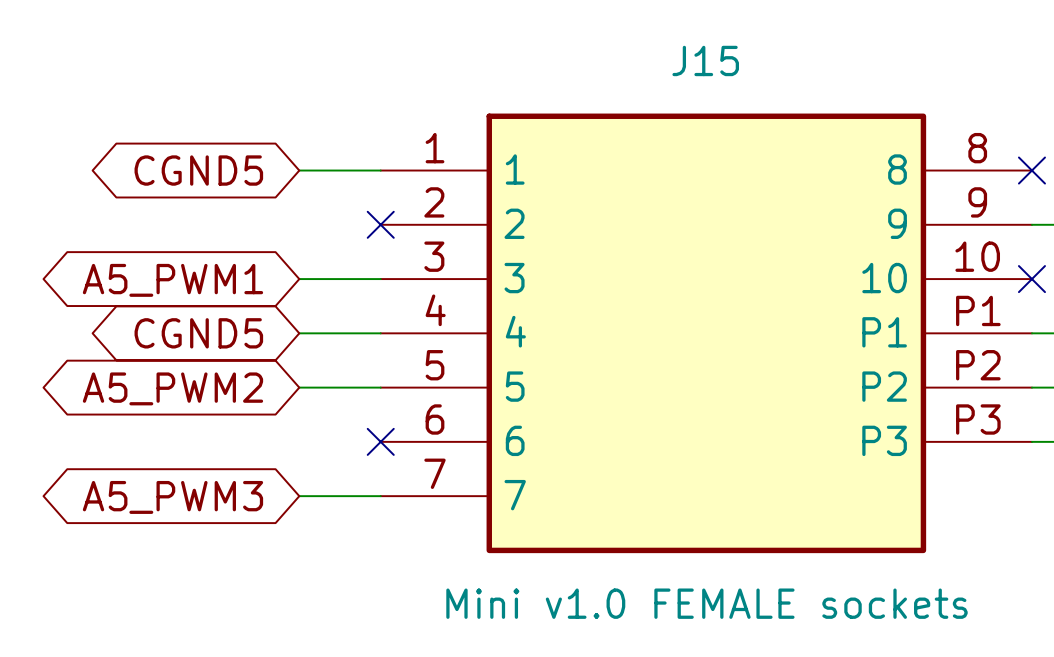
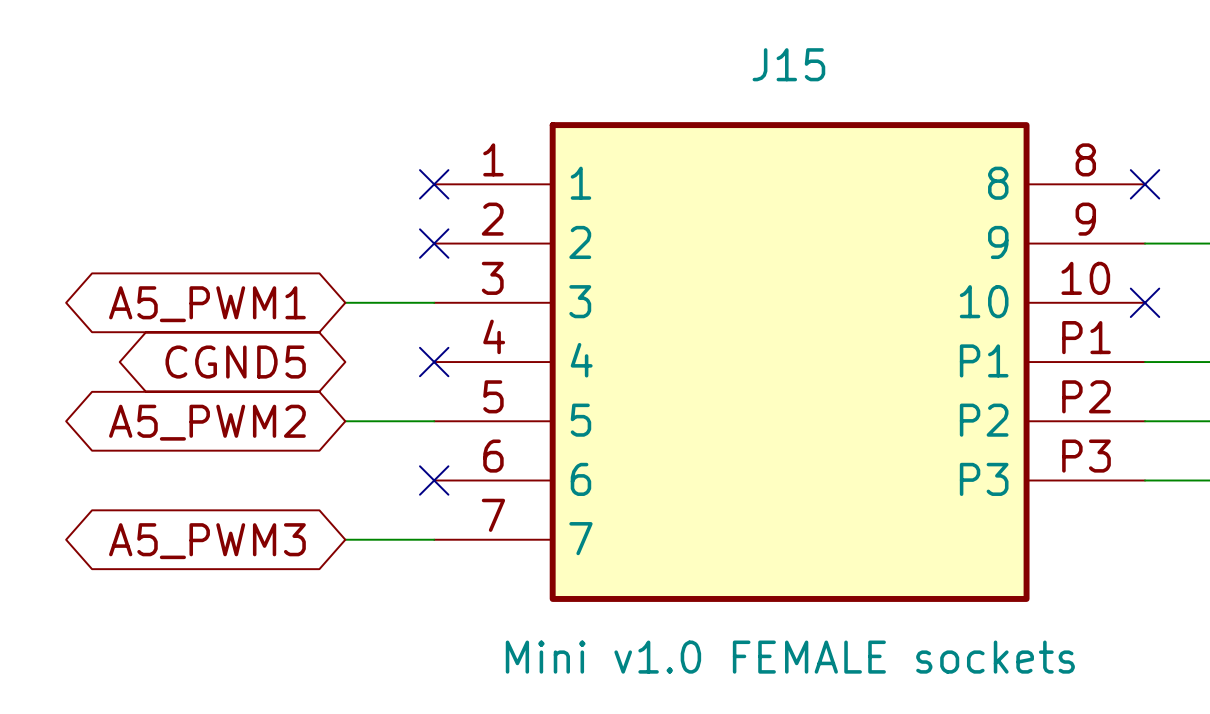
global label: CGND5 (198, 170) -> none
wire: (299, 170) (380, 170) -> none
no-connect mark: none -> (434, 184)
wire: (299, 333) (380, 333) -> none
no-connect mark: none -> (434, 362)

